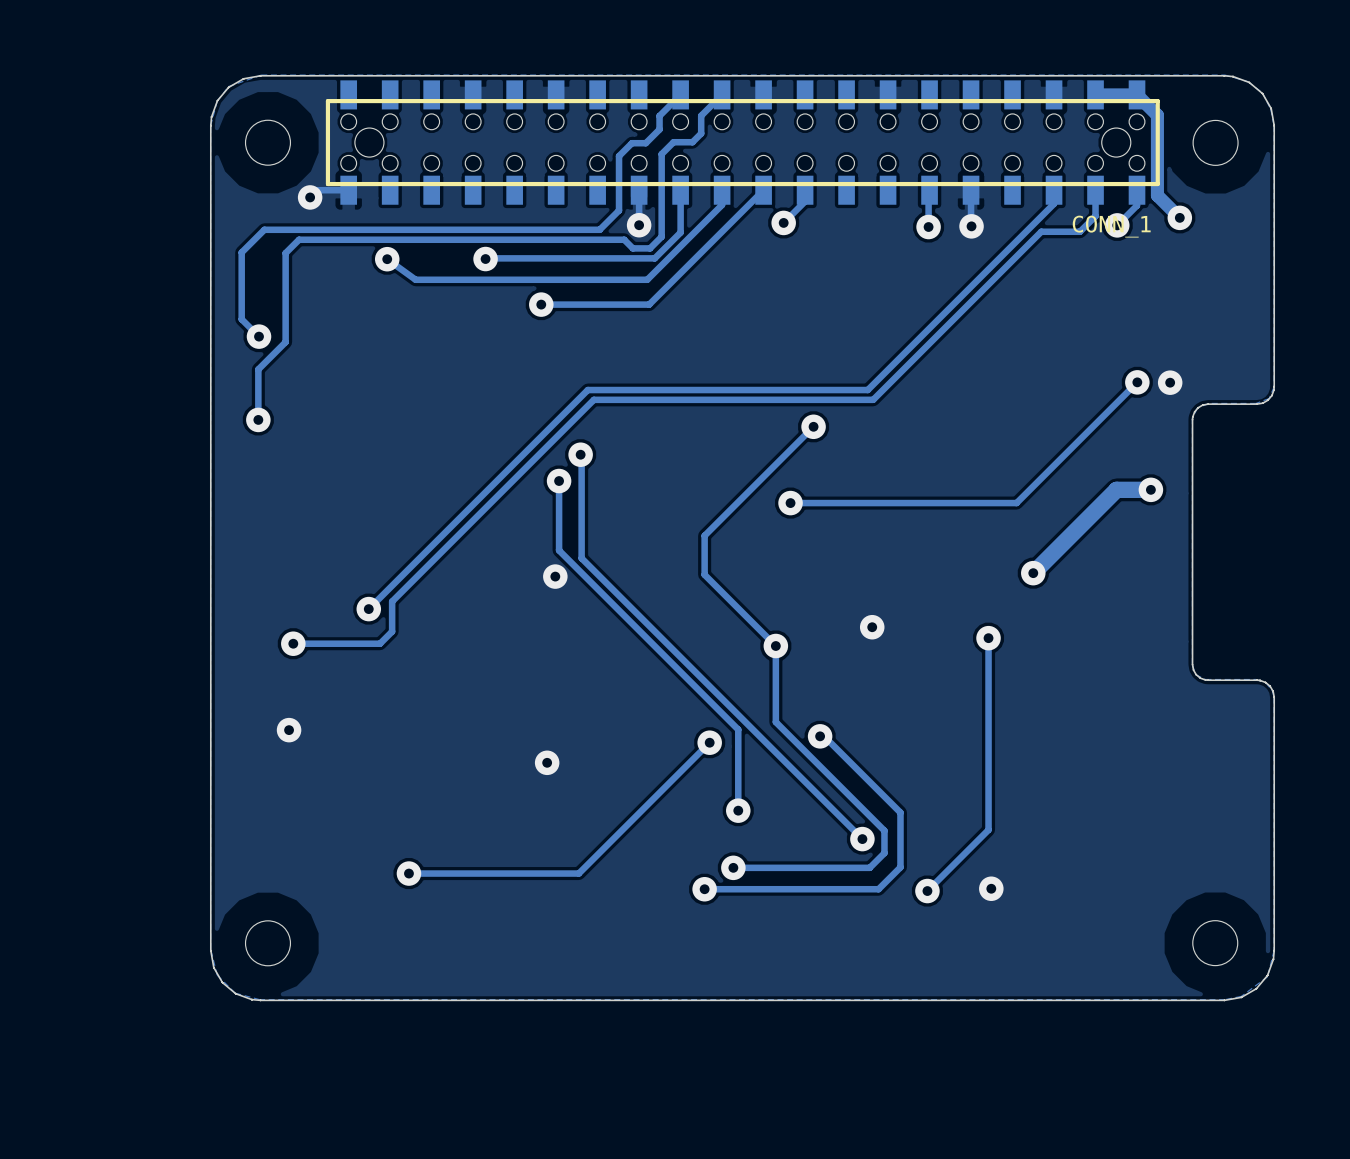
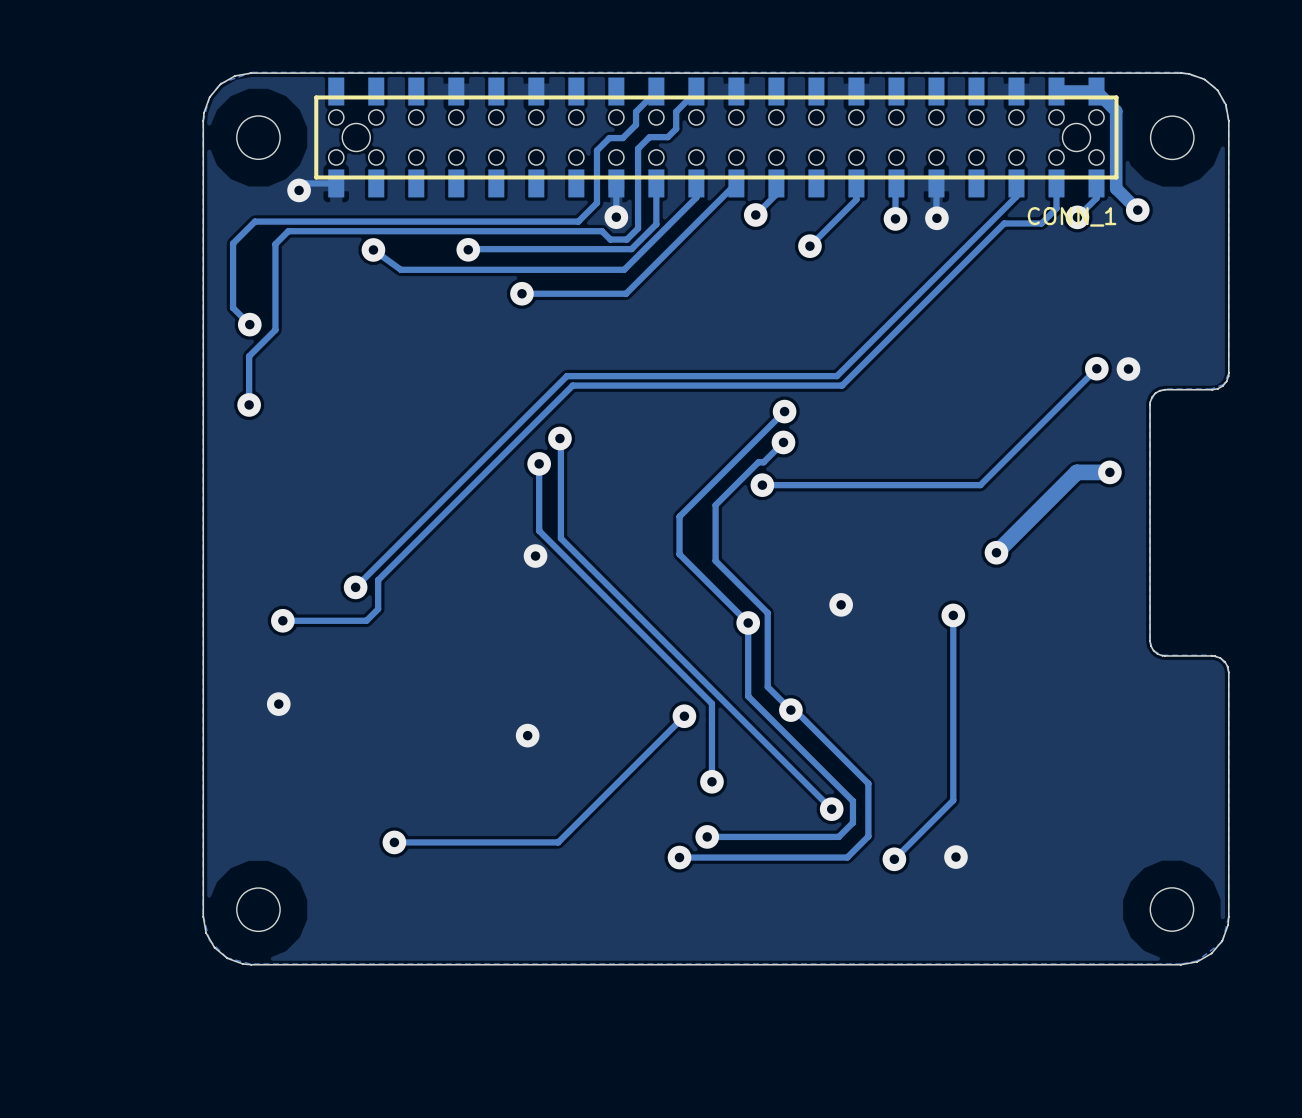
track: none -> (856, 183) (856, 199) (809, 246)
via: none -> (809, 246)
track: none -> (783, 442) (763, 462) (758, 462) (715, 505) (715, 560) (767, 613) (767, 686) (790, 710)
via: none -> (783, 442)

